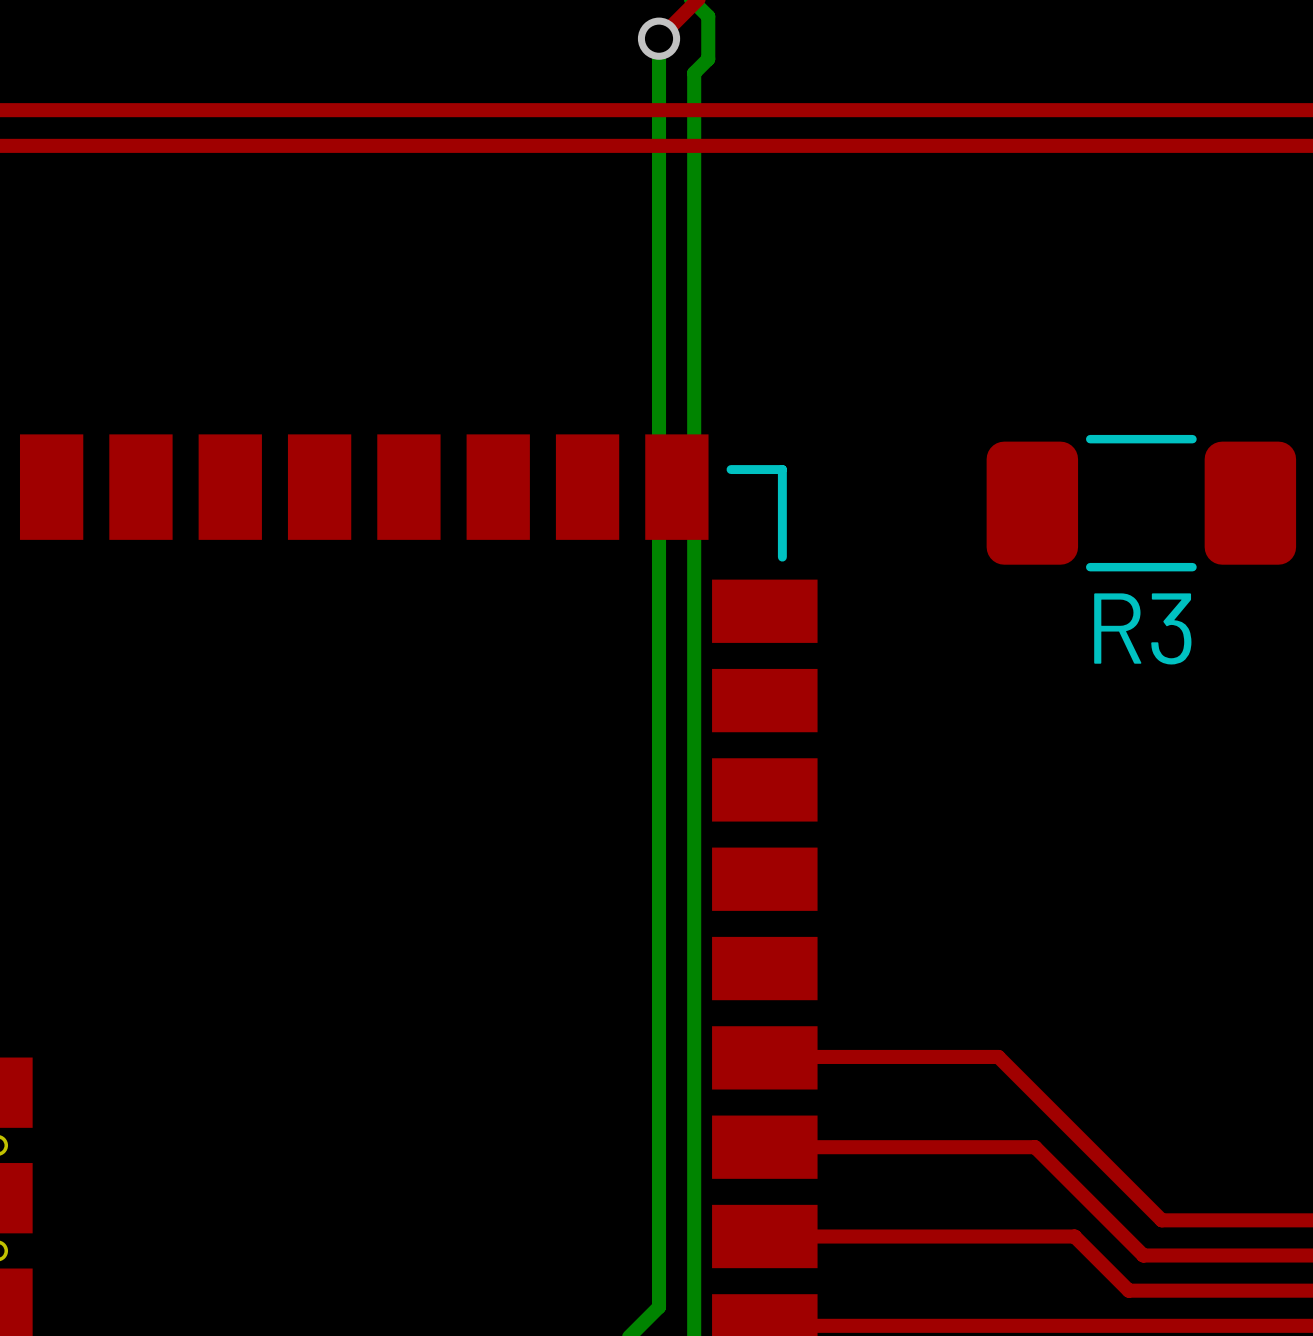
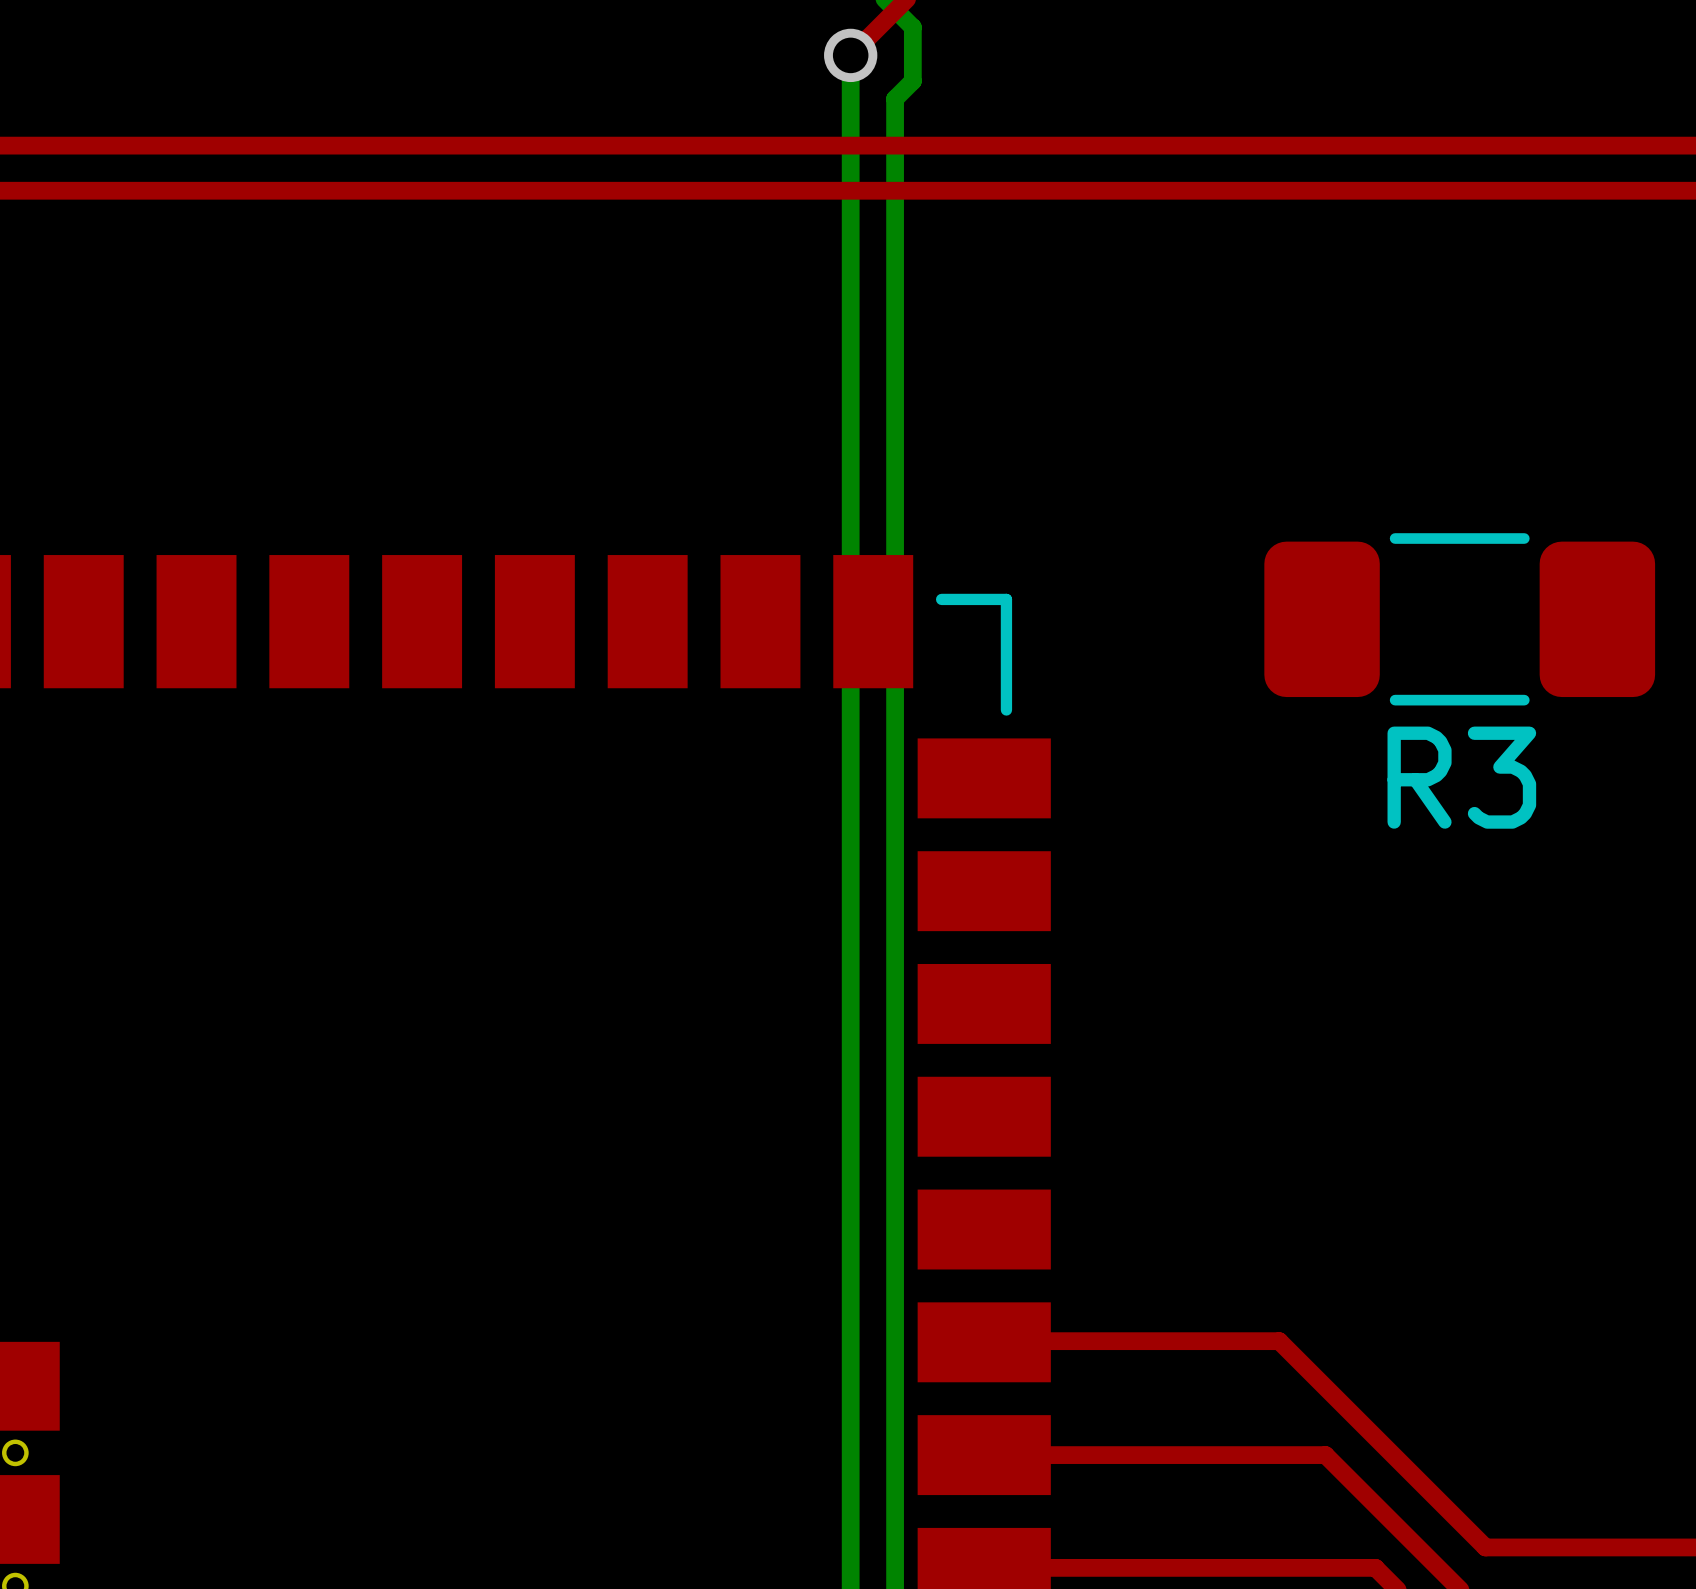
R3 position: (1141, 503) -> (1459, 619)

